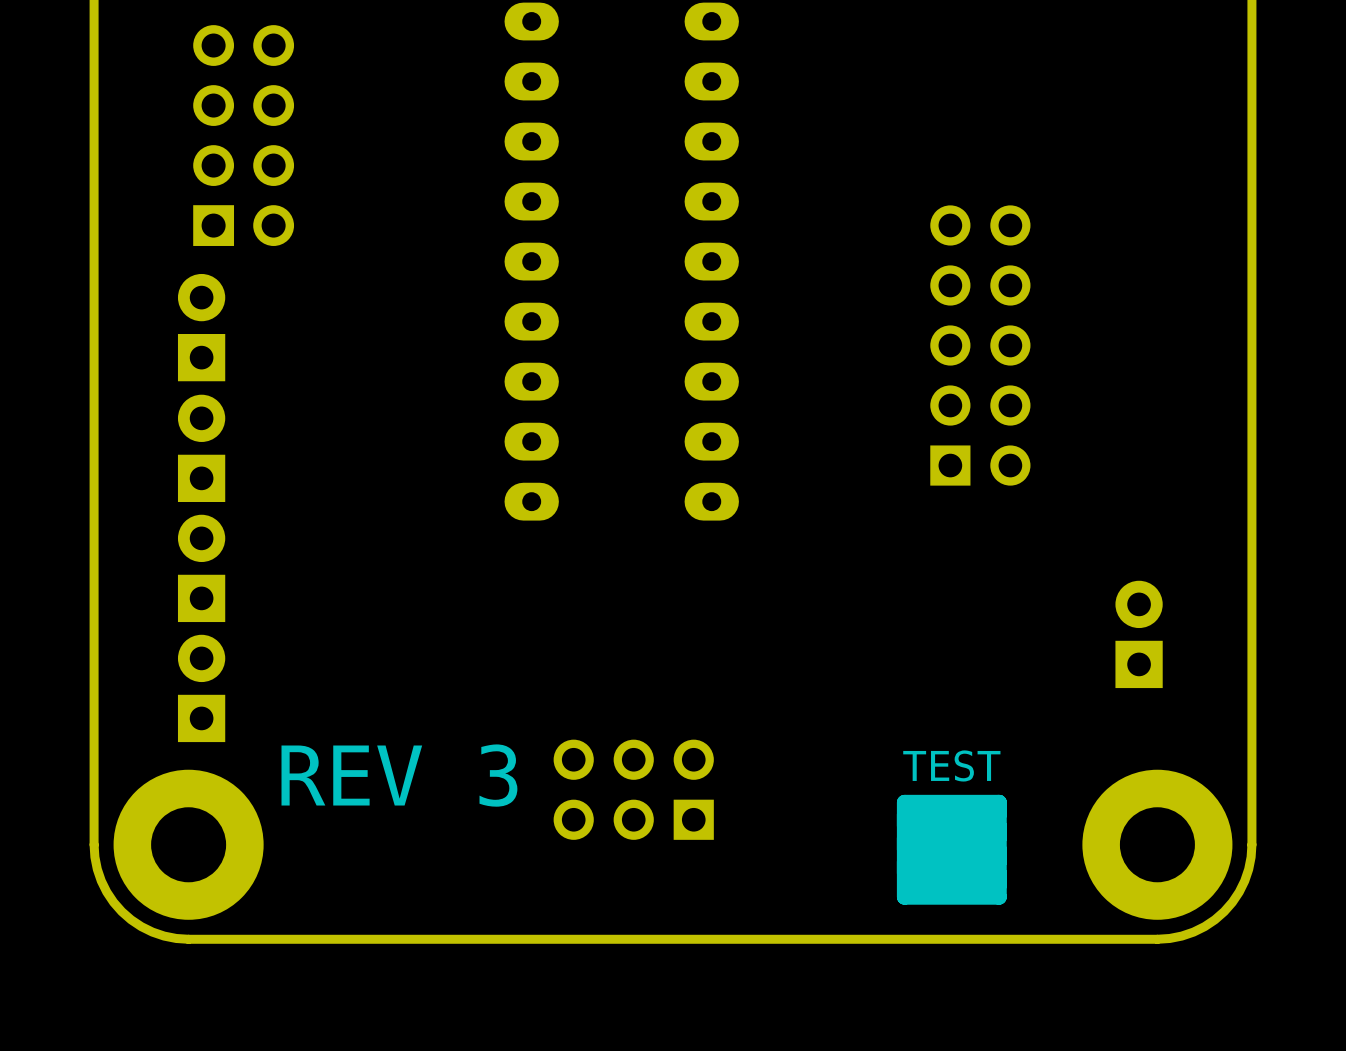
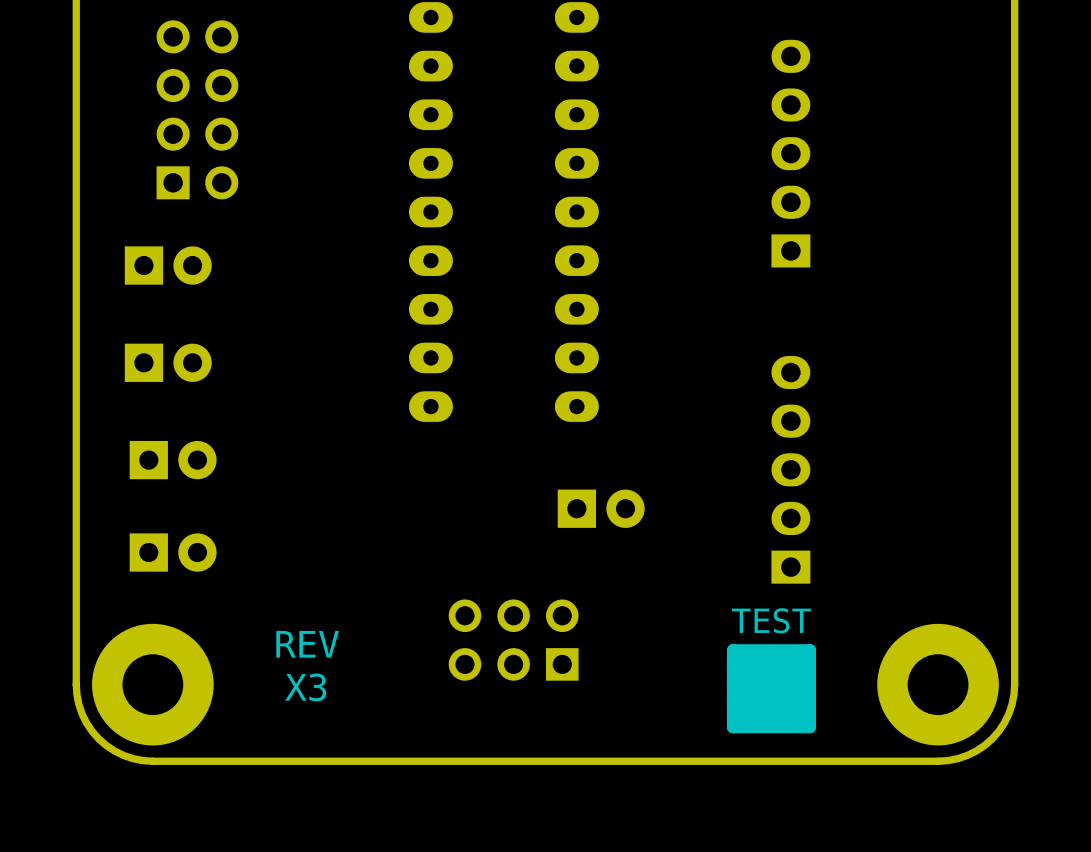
part: none -> (790, 153)
part rotation: 0° (201, 327) -> 90° clockwise (168, 265)
part: (980, 345) -> none
part rotation: 0° (201, 448) -> 90° clockwise (168, 362)
part rotation: 0° (201, 568) -> 90° clockwise (173, 460)
part: none -> (790, 469)
part rotation: 0° (1139, 634) -> 90° clockwise (601, 508)
part position: (1139, 634) -> (601, 508)
part rotation: 0° (201, 688) -> 90° clockwise (173, 552)
text: REV 3 (399, 775) -> REV (307, 644)
text: none -> X3 (305, 687)

